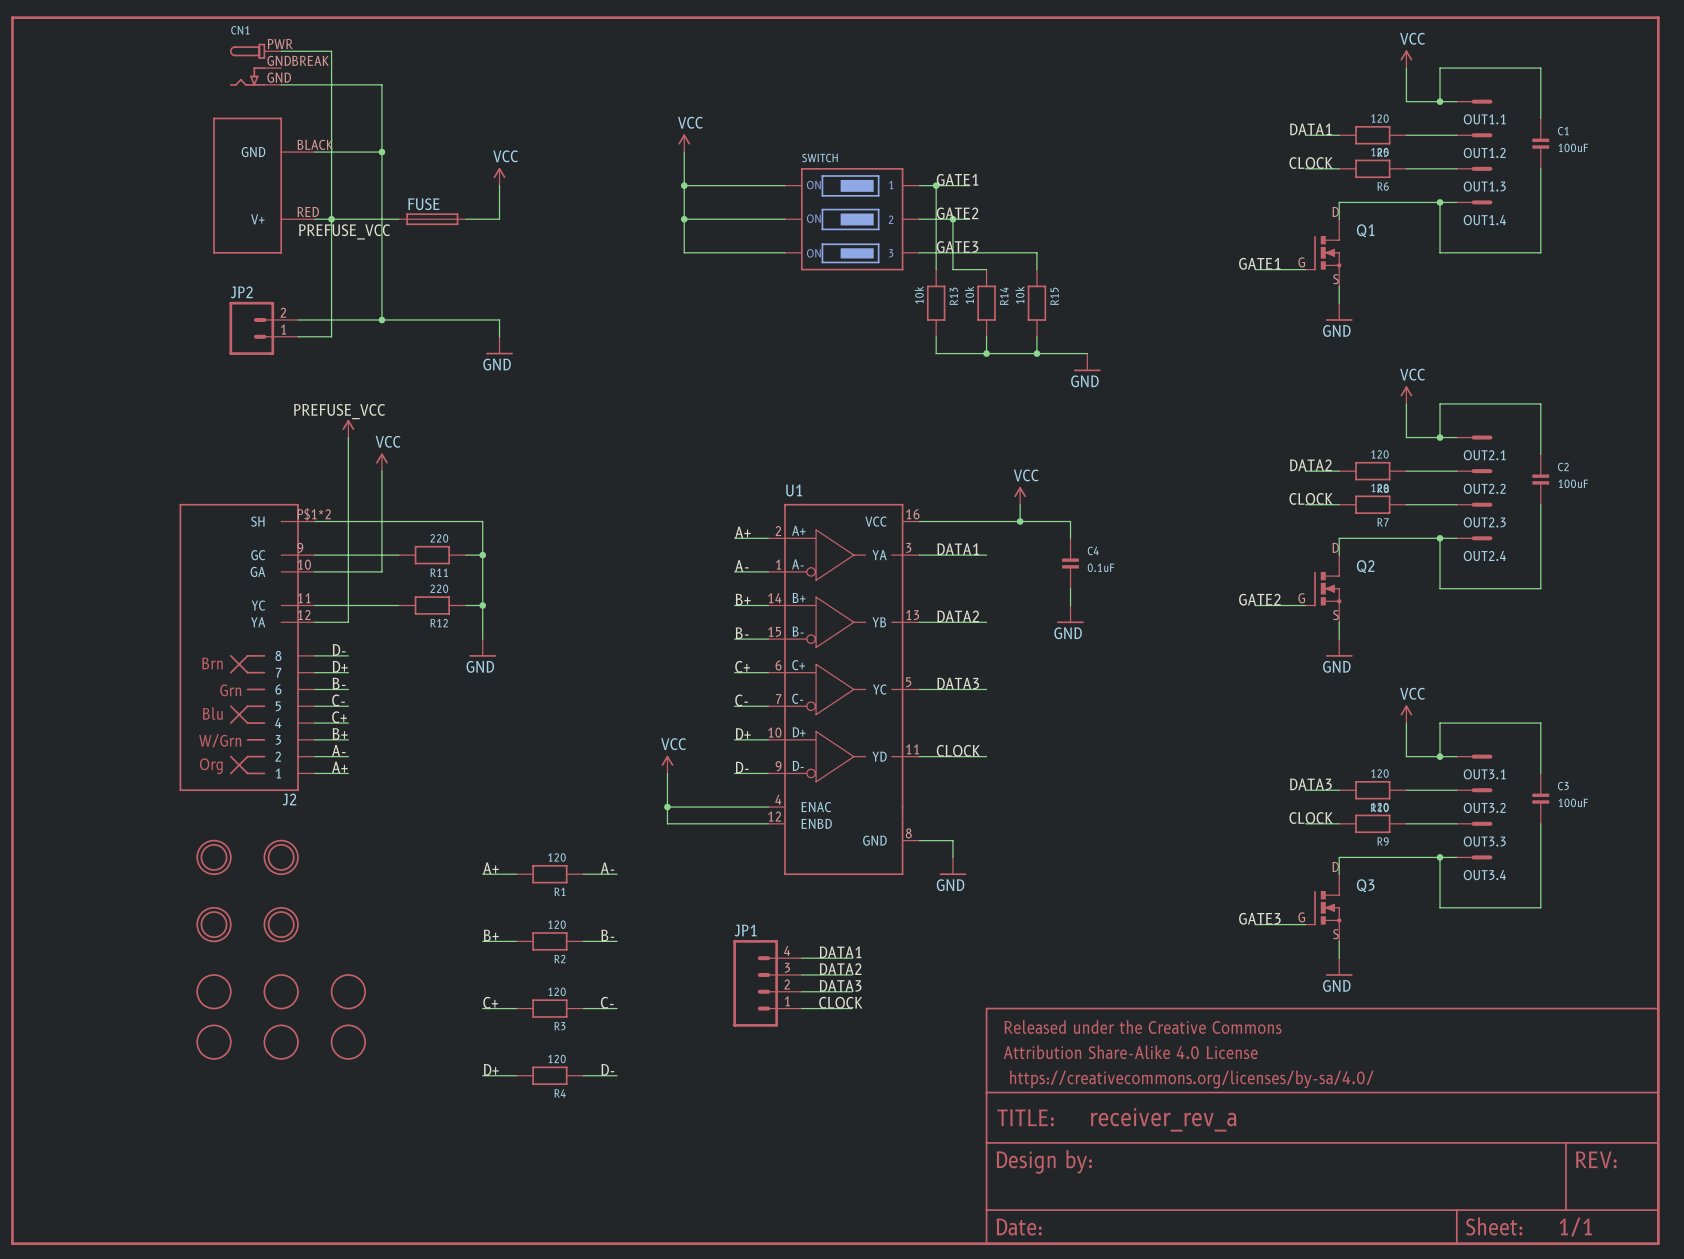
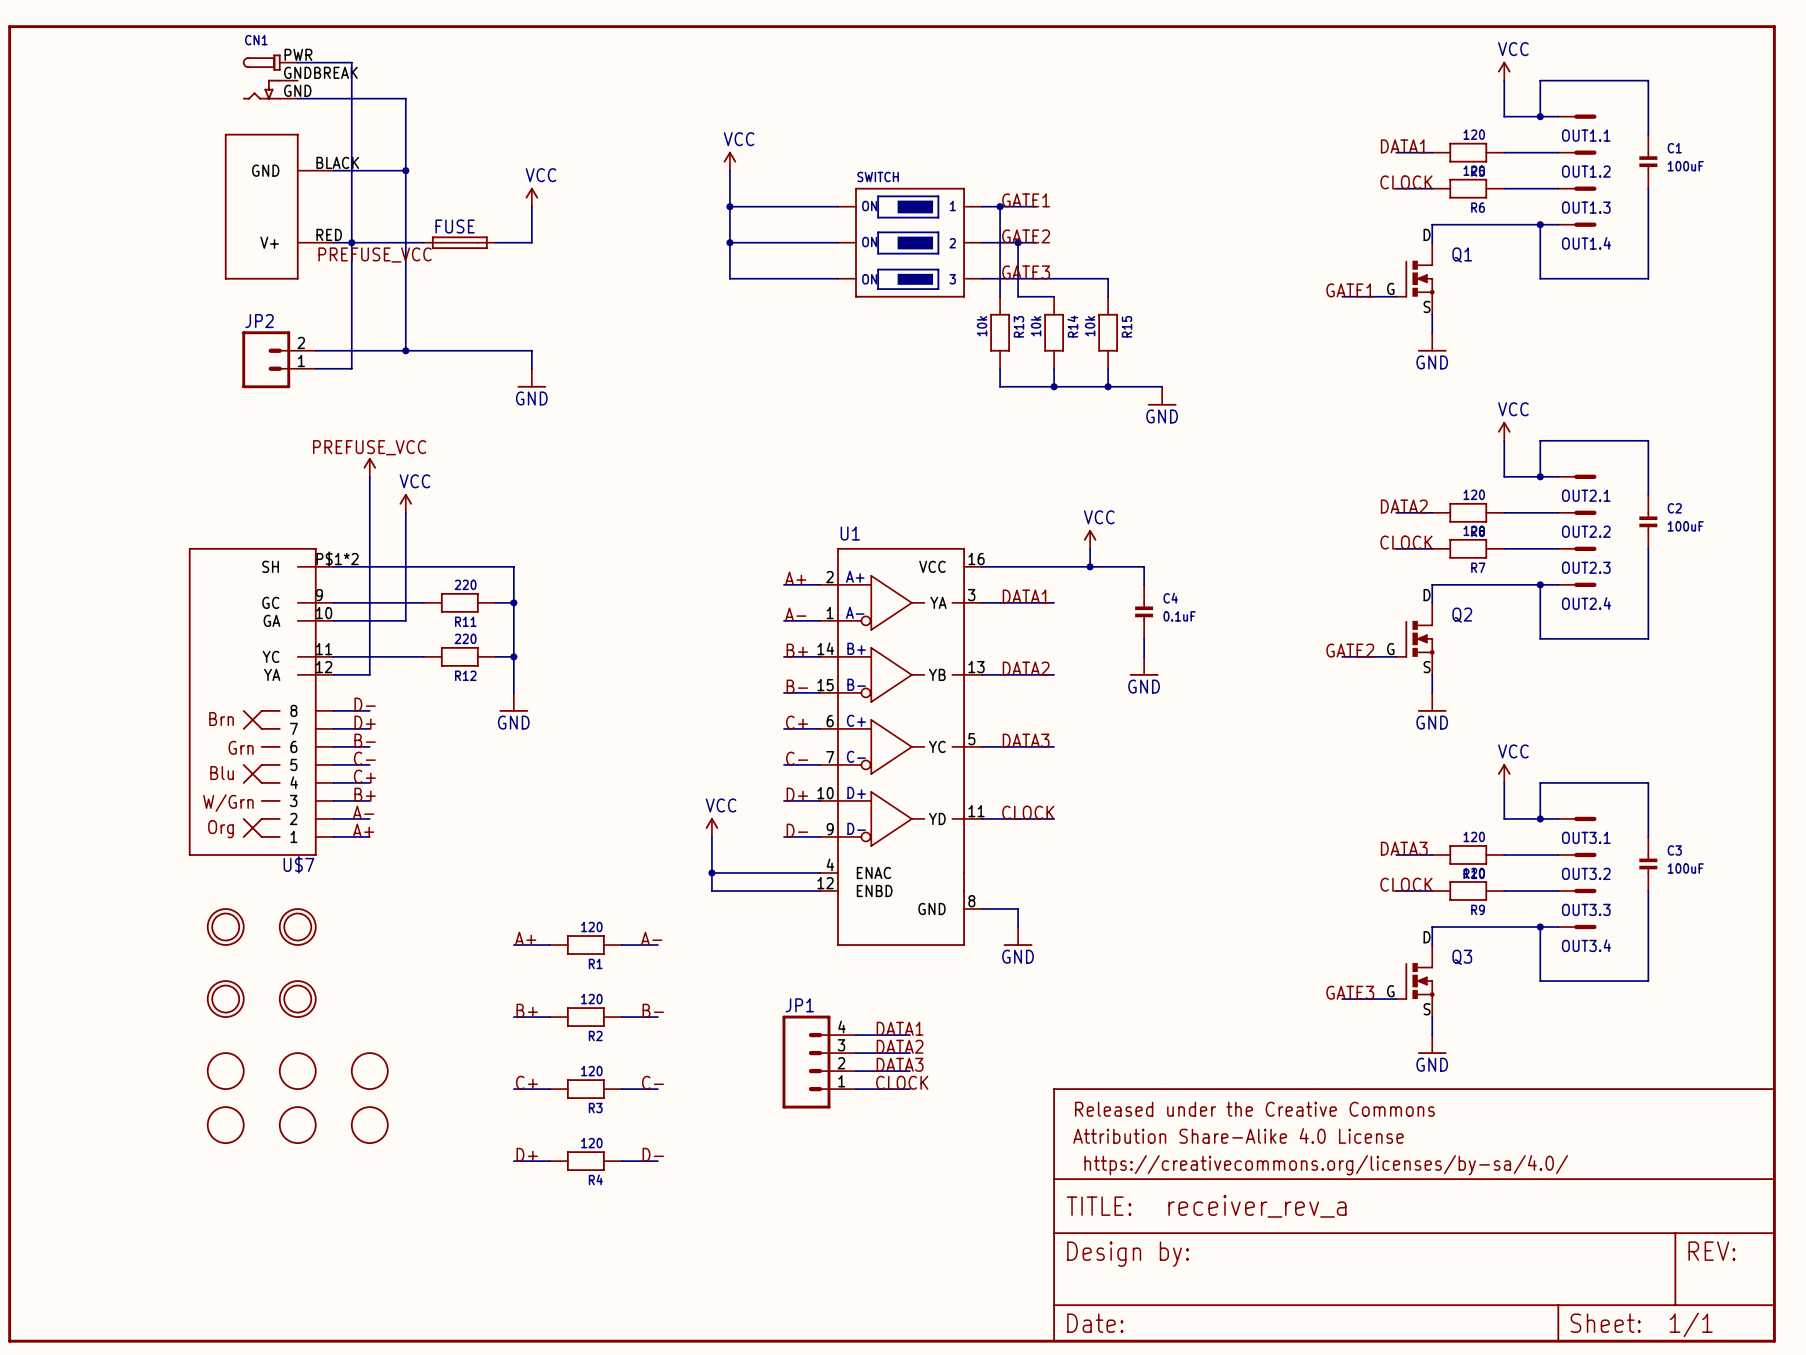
J2 name: J2 (289, 799) -> U$7 (298, 864)

